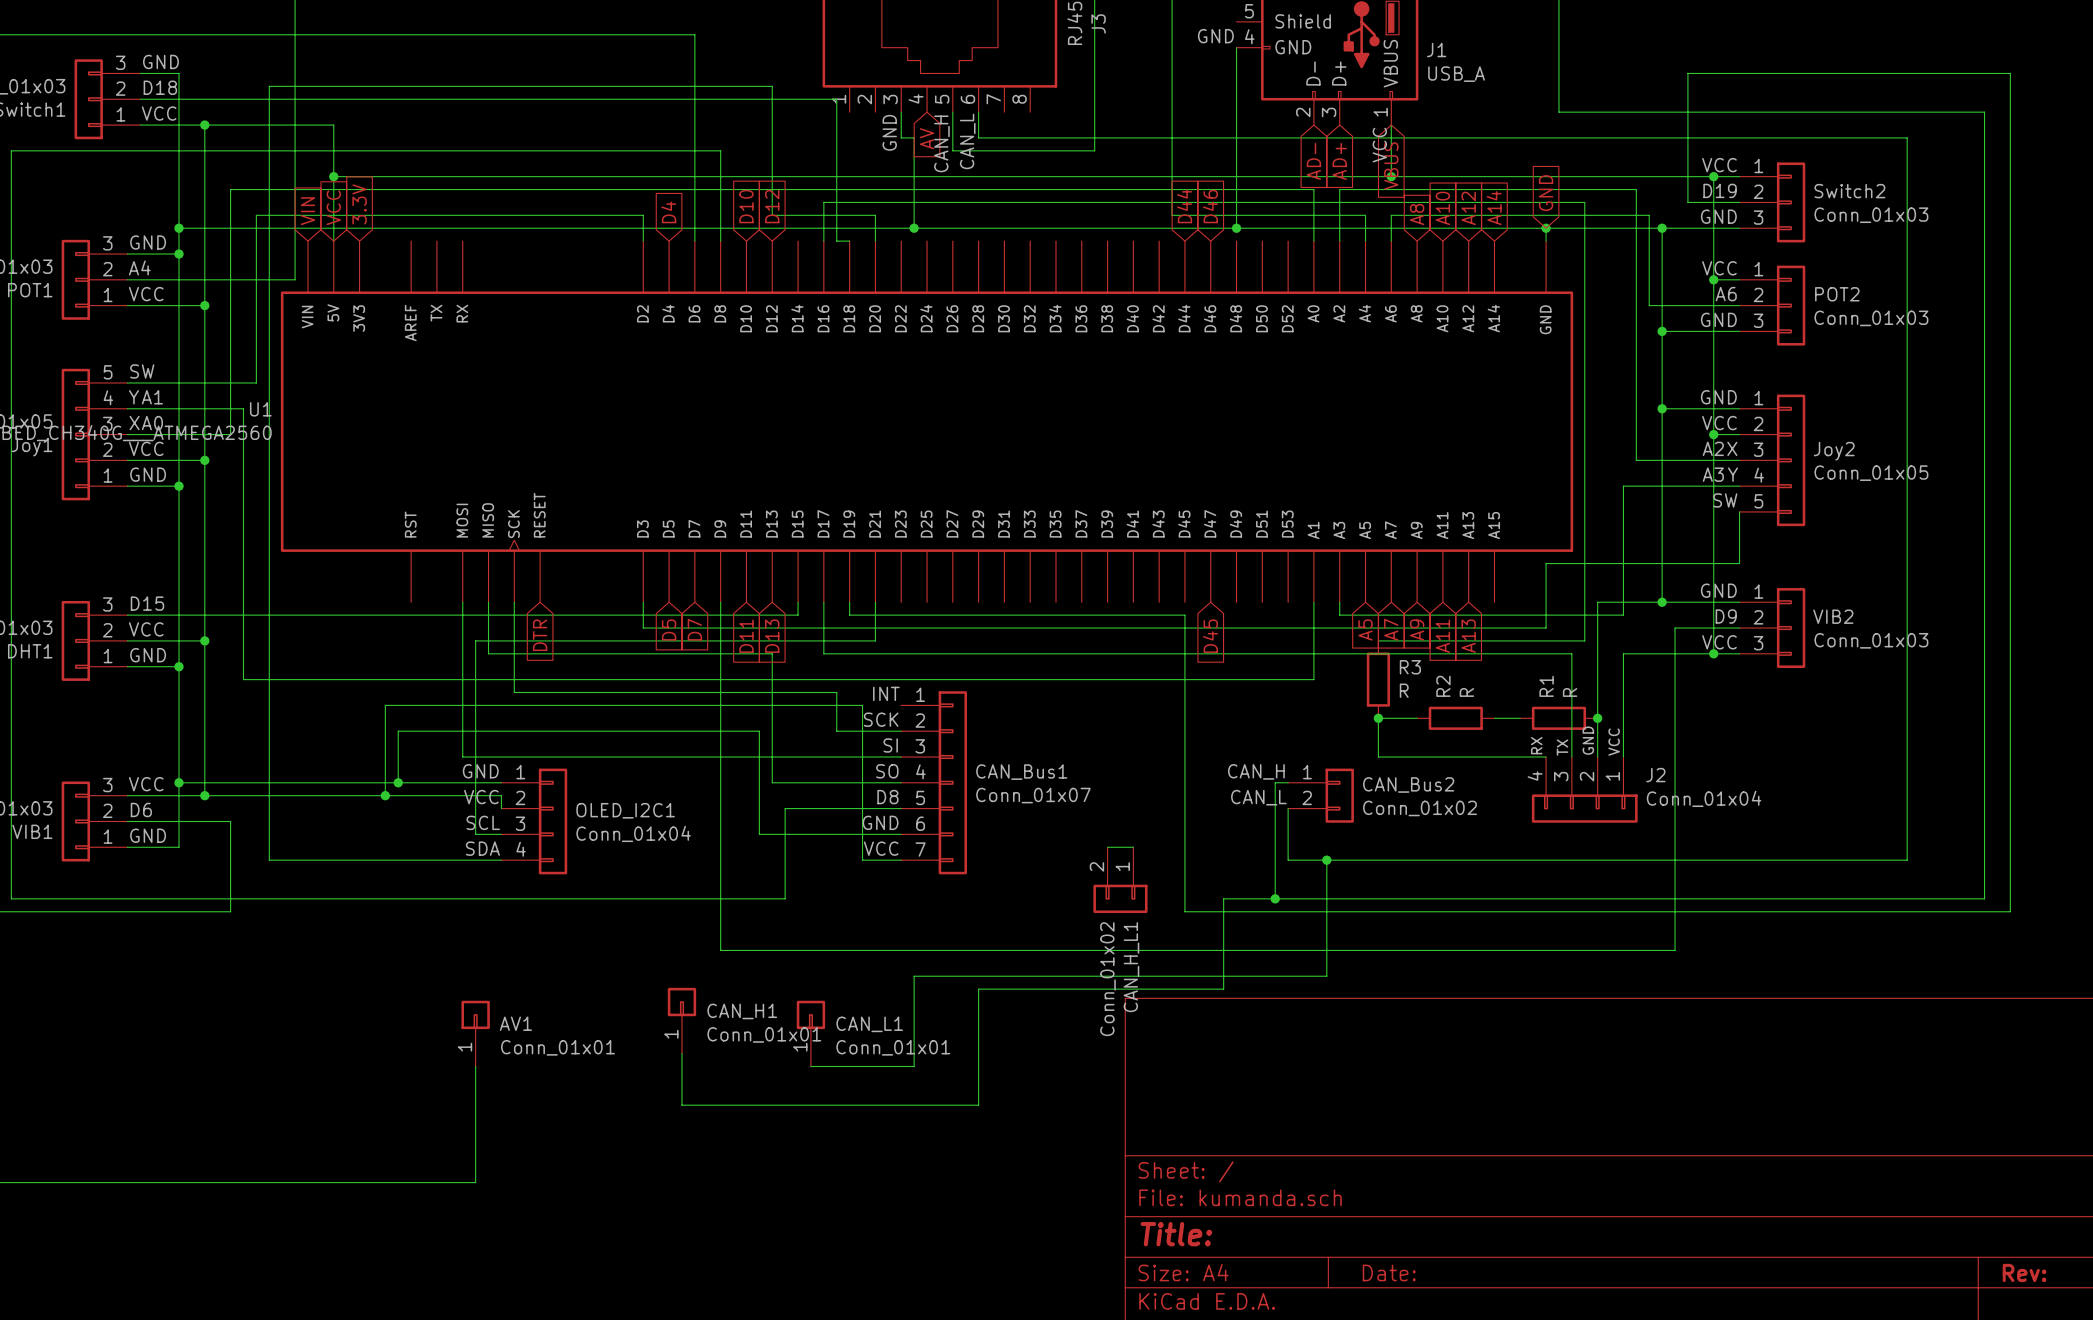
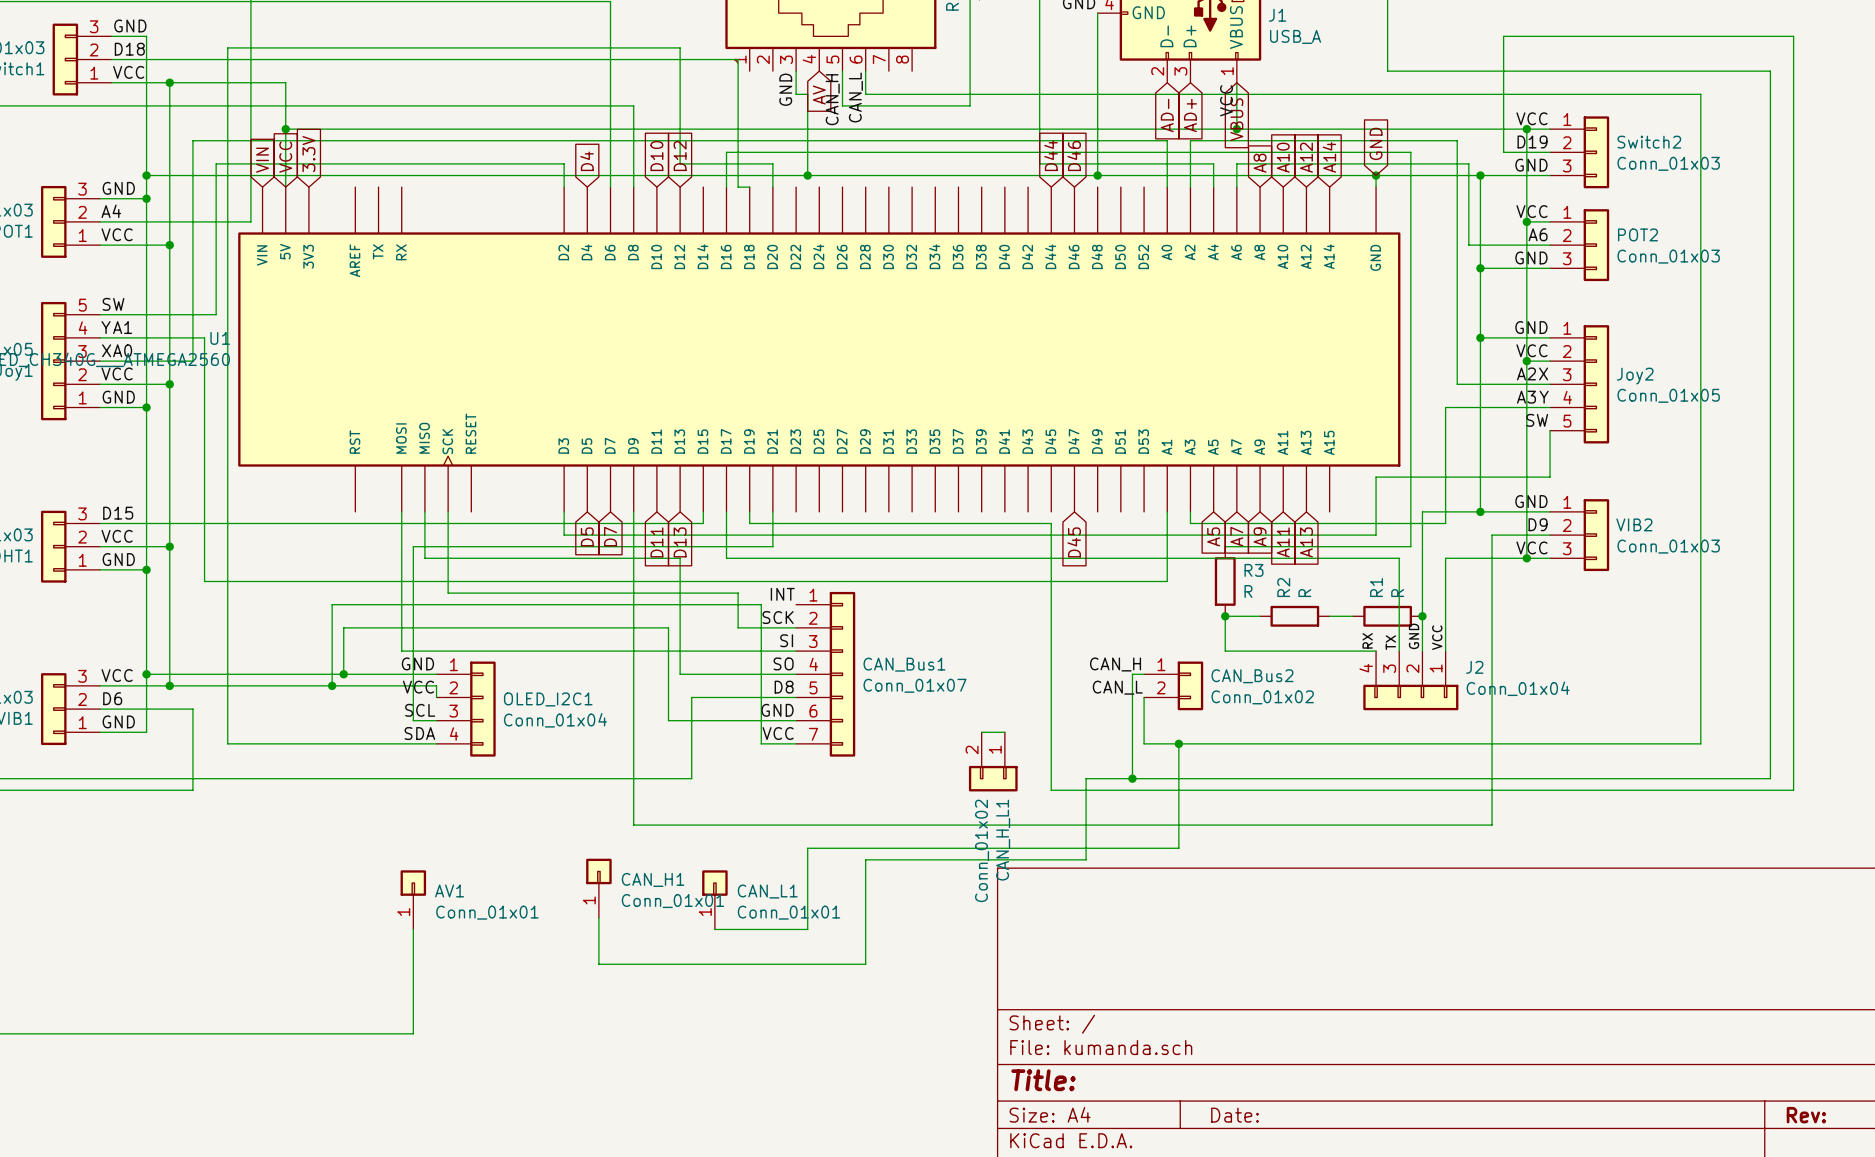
global label: DTR (540, 635) -> none

